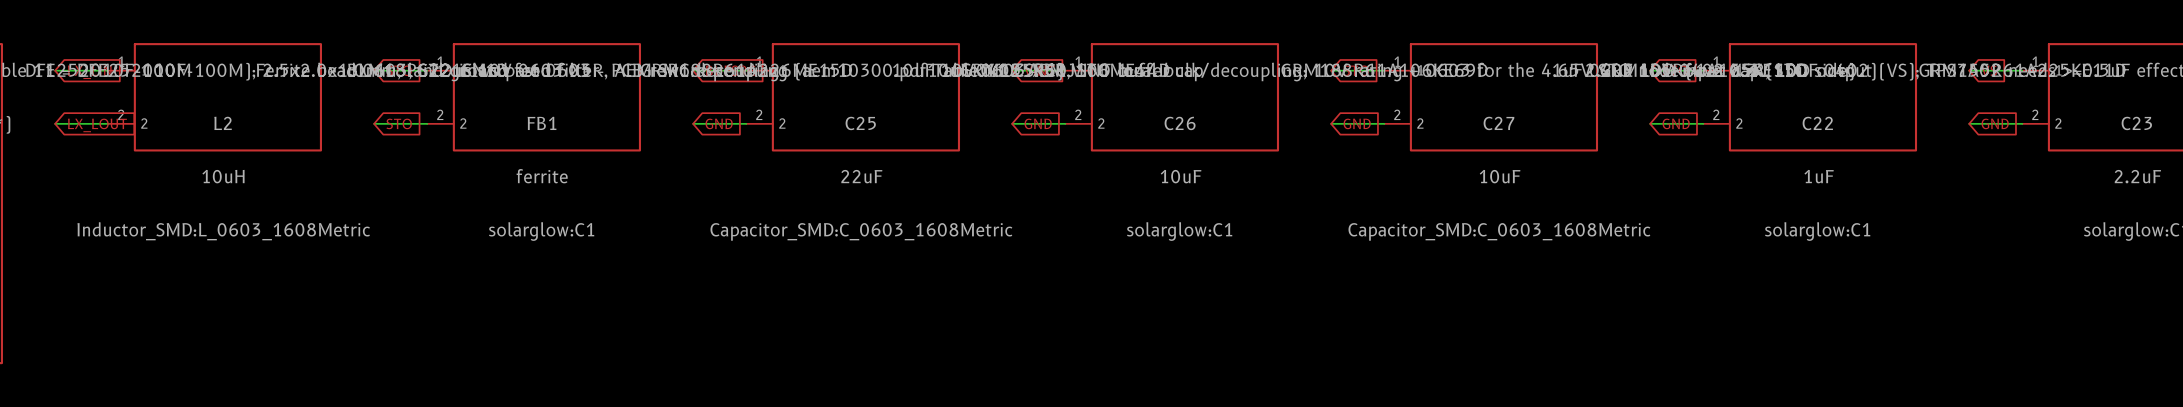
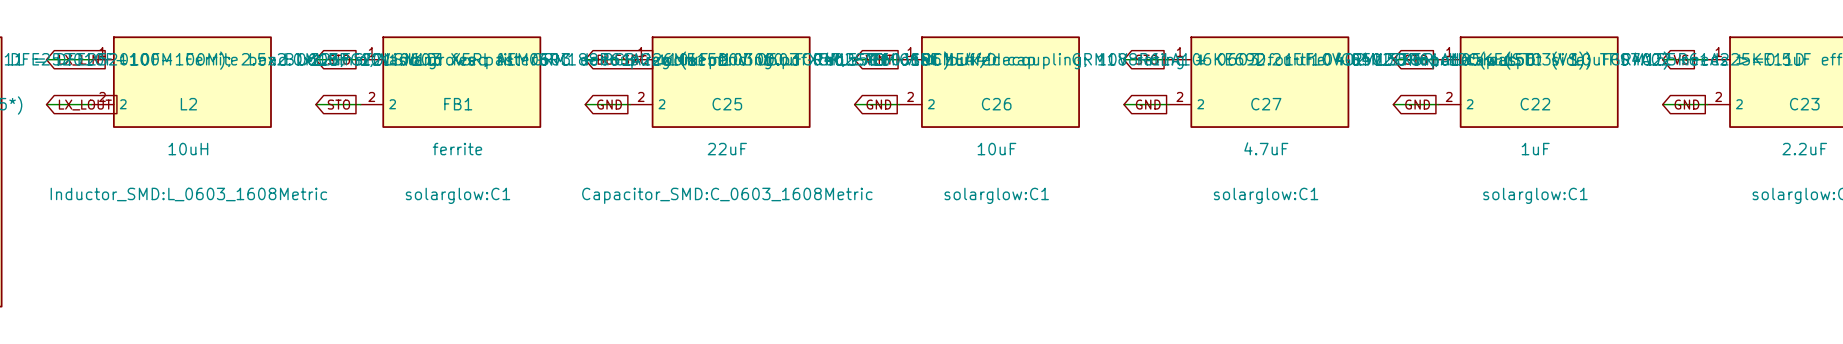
C27 value: 10uF (1500, 176) -> 4.7uF (1266, 148)
C27 text: Capacitor_SMD:C_0603_1608Metric (1499, 231) -> solarglow:C1 (1266, 195)

